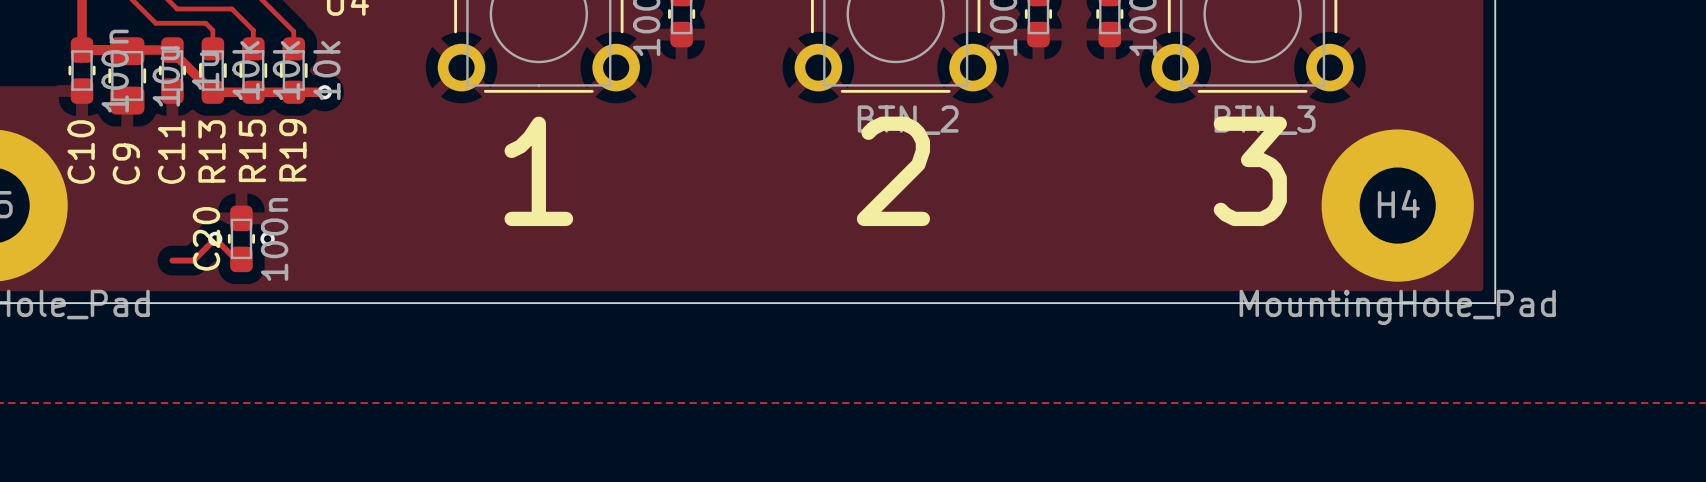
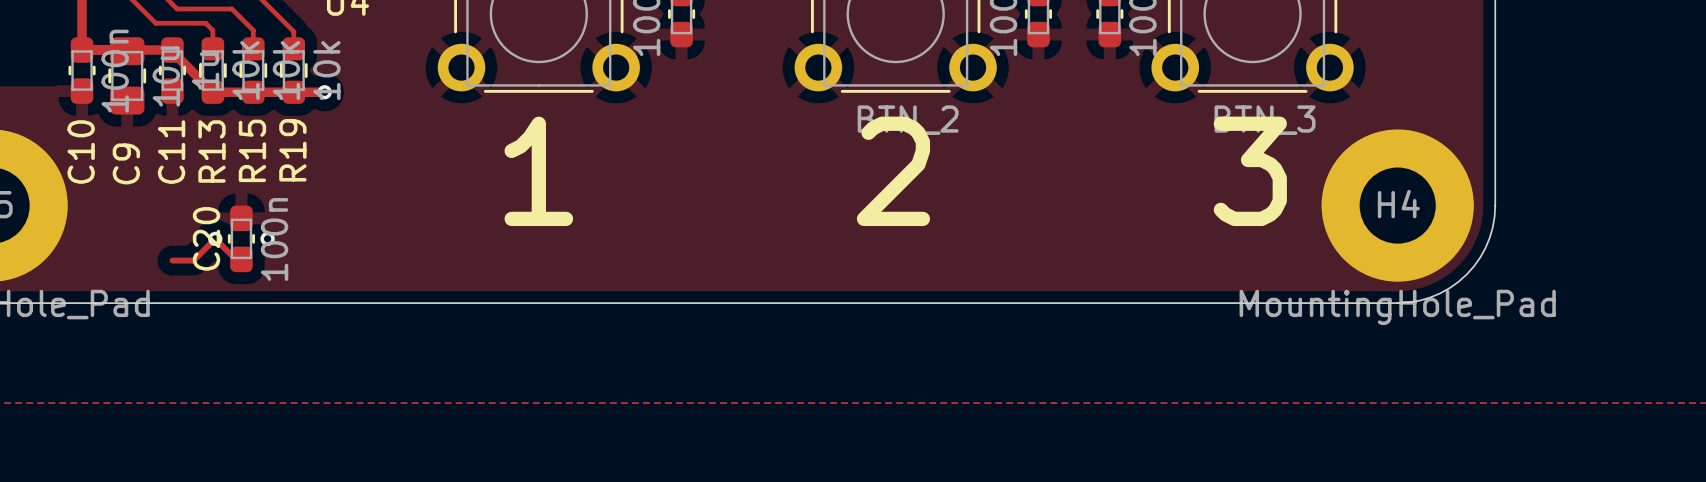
board edge: (1495, 205) (1495, 303) (1397, 303) -> (1495, 205) (1492, 227) (1485, 247) (1466, 274) (1440, 293) (1419, 300) (1397, 303)

